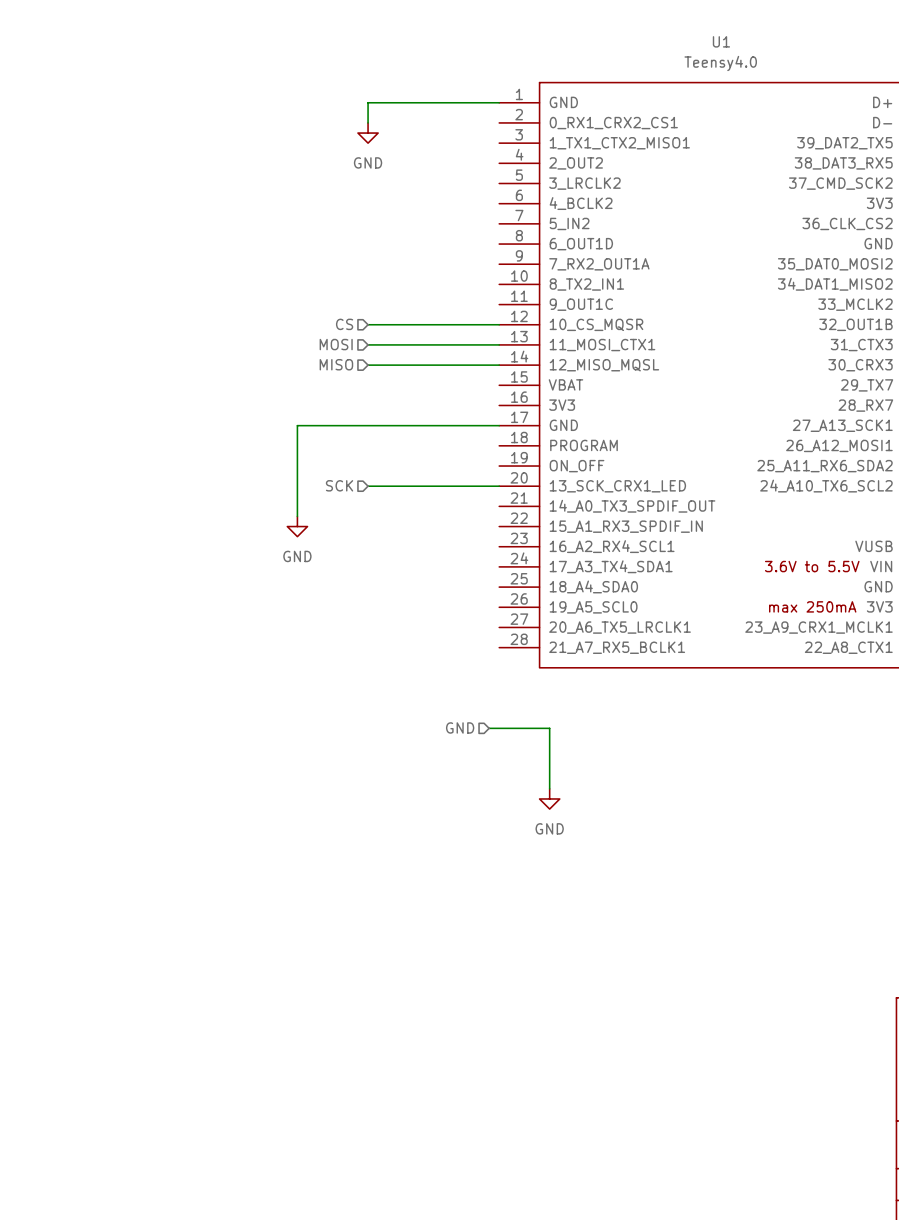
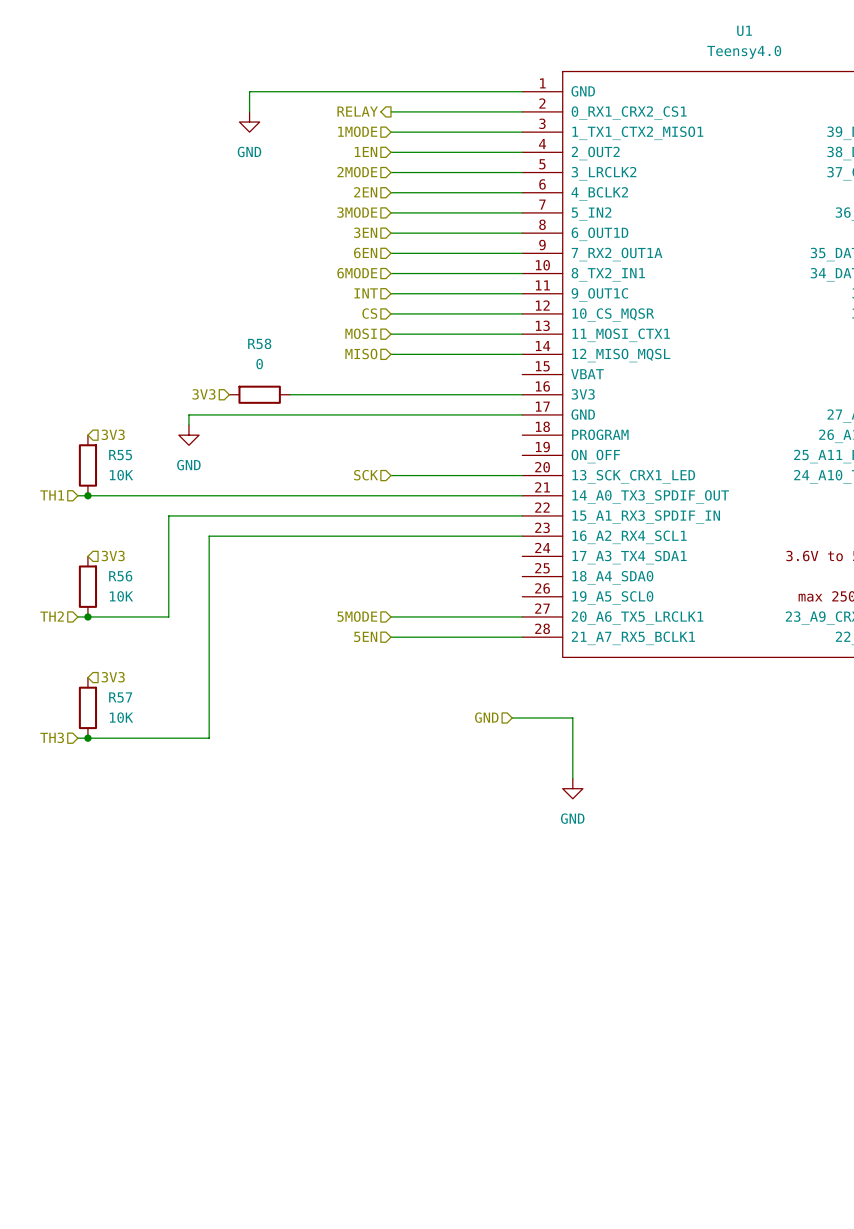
wire: (368, 102) (368, 122) -> (522, 111) (390, 111)
wire: none -> (390, 91) (249, 91) (249, 111)
hierarchical label: none -> RELAY (357, 111)
power symbol position: GND (368, 133) -> GND (249, 122)
hierarchical label: none -> 1MODE (357, 131)
wire: none -> (390, 132) (522, 132)
hierarchical label: none -> 1EN (366, 151)
wire: none -> (390, 152) (522, 152)
hierarchical label: none -> 2MODE (357, 172)
wire: none -> (390, 172) (522, 172)
hierarchical label: none -> 2EN (365, 192)
wire: none -> (390, 192) (522, 192)
hierarchical label: none -> 3MODE (357, 212)
wire: none -> (390, 212) (522, 212)
hierarchical label: none -> 3EN (365, 232)
wire: none -> (390, 233) (522, 233)
hierarchical label: none -> 6EN (365, 252)
wire: none -> (390, 253) (522, 253)
hierarchical label: none -> 6MODE (357, 273)
wire: none -> (390, 273) (522, 273)
hierarchical label: none -> INT (366, 293)
wire: none -> (390, 293) (522, 293)
hierarchical label: none -> 3V3 (203, 394)
R58: none -> 0 (259, 394)
wire: none -> (289, 394) (522, 394)
wire: (297, 425) (297, 516) -> (320, 414) (188, 414) (188, 425)
hierarchical label: none -> 3V3 (113, 434)
R55: none -> 10K (87, 465)
hierarchical label: none -> TH1 (52, 495)
wire: none -> (77, 495) (522, 495)
junction: none -> (87, 495)
power symbol position: GND (297, 526) -> GND (188, 435)
wire: none -> (522, 515) (168, 515) (168, 616) (77, 616)
wire: none -> (522, 536) (209, 536) (209, 738) (77, 738)
hierarchical label: none -> 3V3 (113, 556)
R56: none -> 10K (87, 586)
hierarchical label: none -> TH2 (52, 616)
junction: none -> (87, 616)
hierarchical label: none -> 5MODE (357, 616)
wire: none -> (390, 616) (522, 616)
hierarchical label: none -> 5EN (365, 636)
wire: none -> (390, 637) (522, 637)
hierarchical label: none -> 3V3 (113, 677)
R57: none -> 10K (87, 707)
hierarchical label: none -> TH3 (52, 737)
junction: none -> (87, 738)

